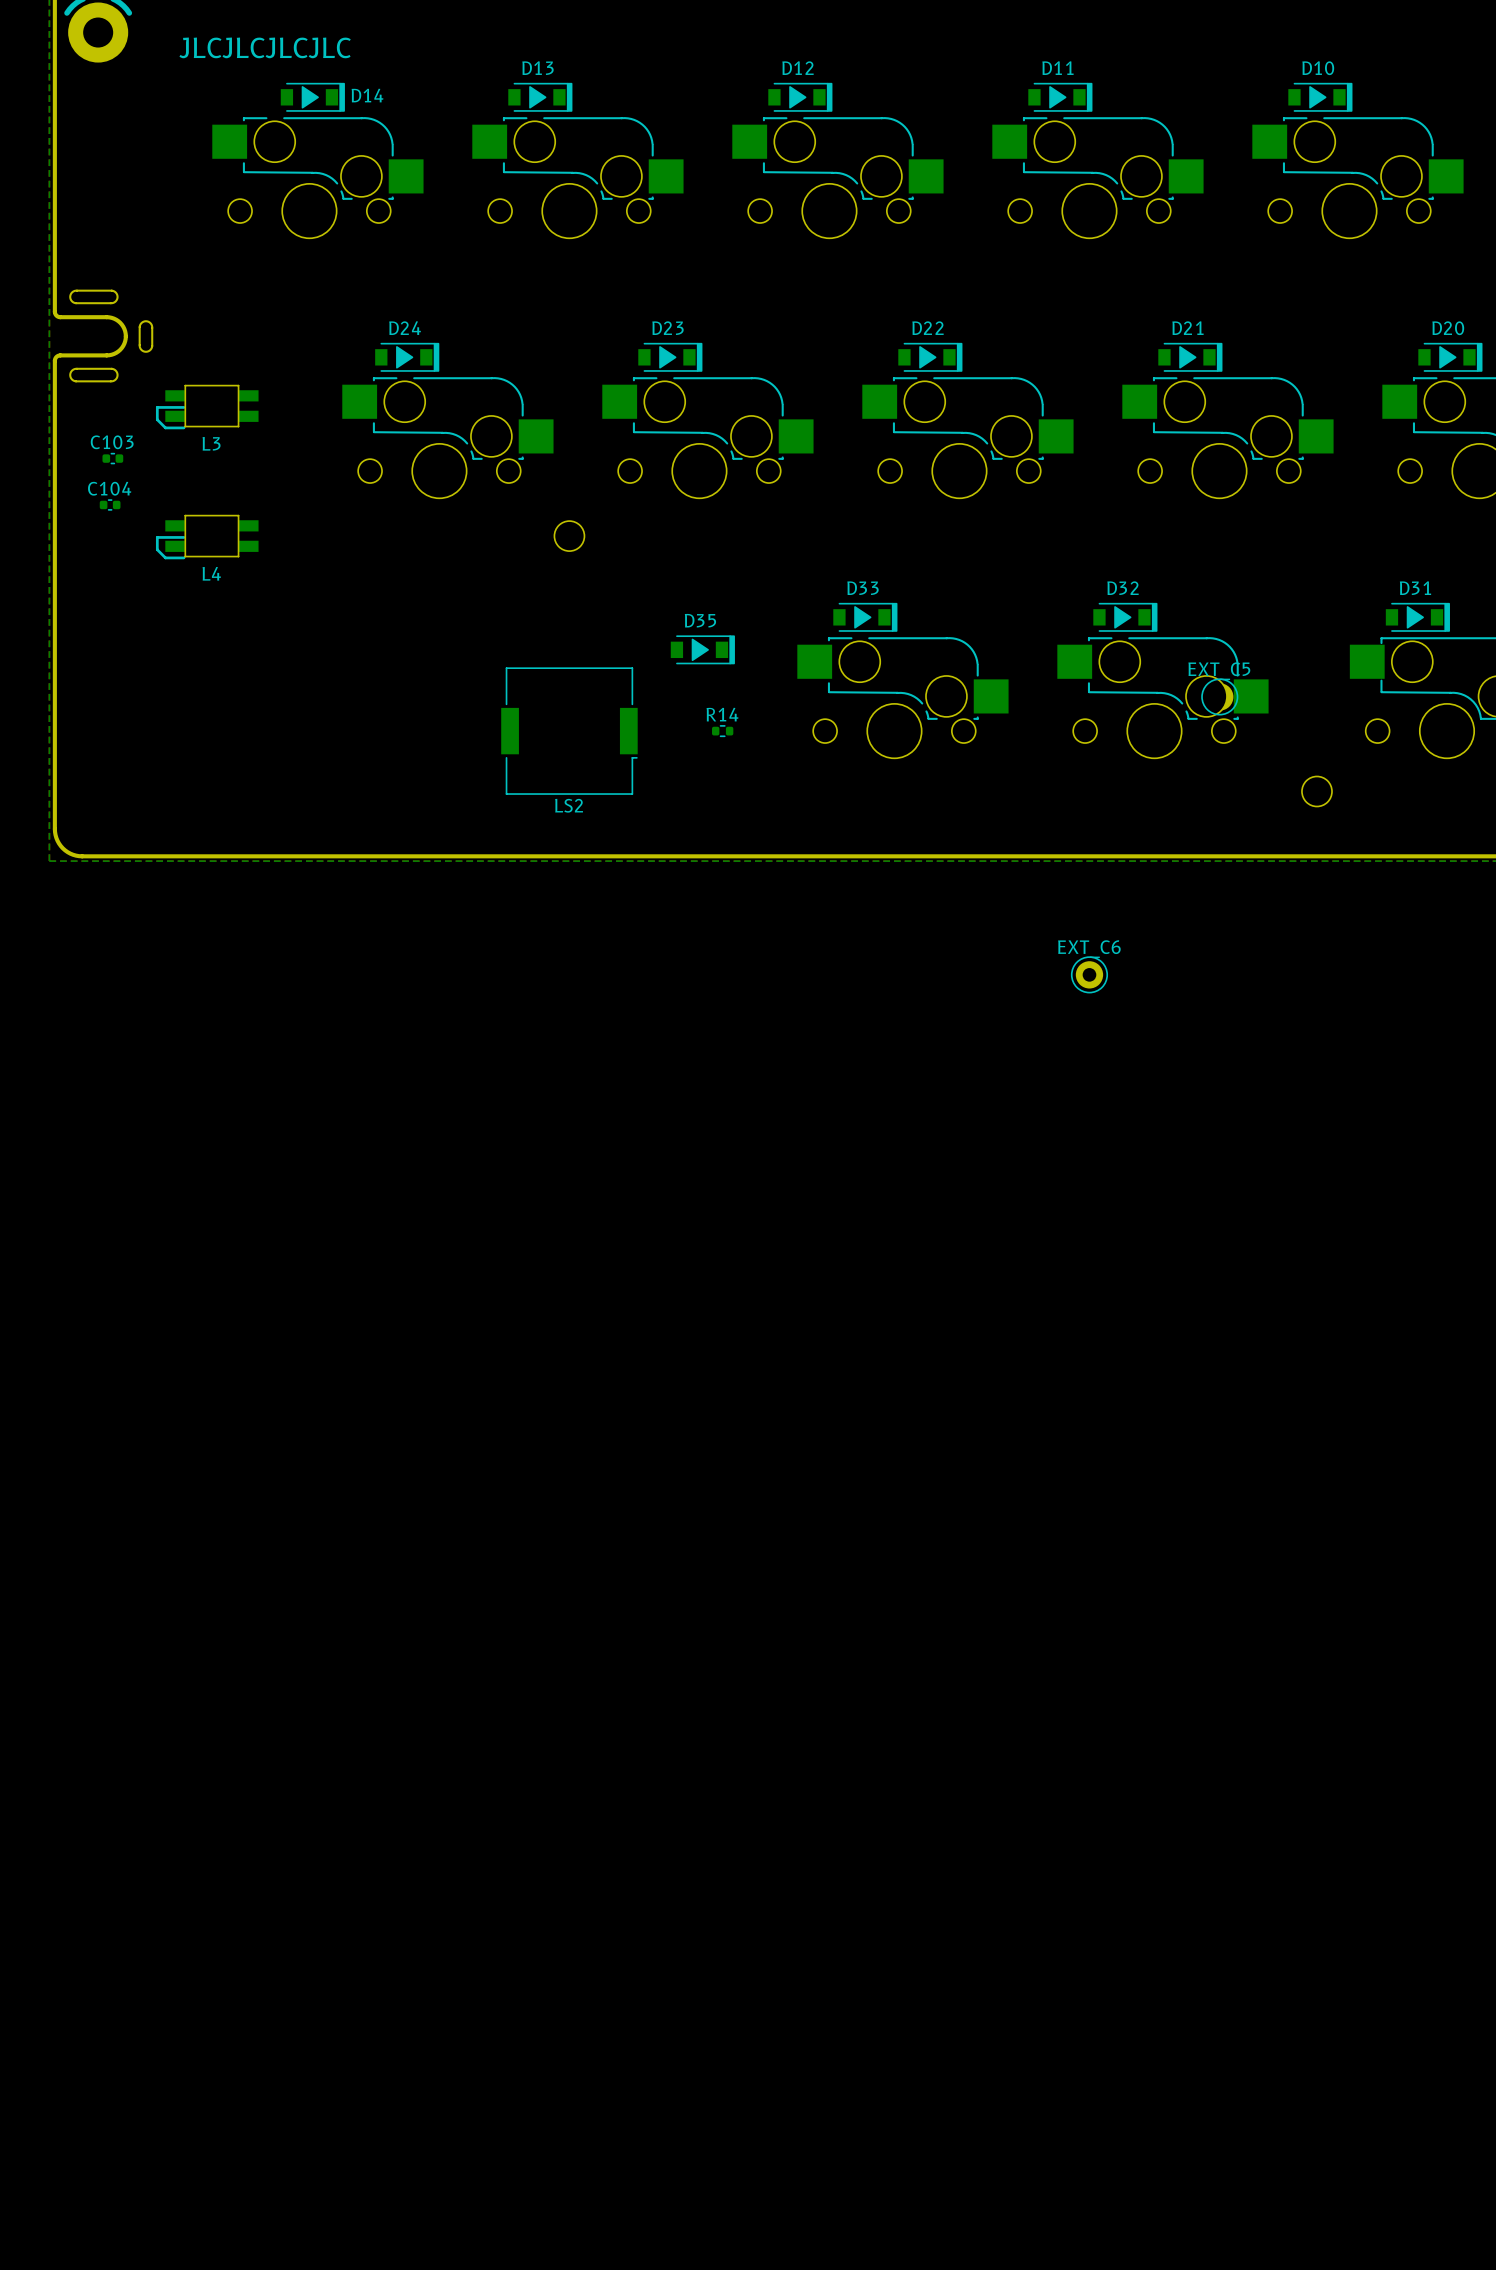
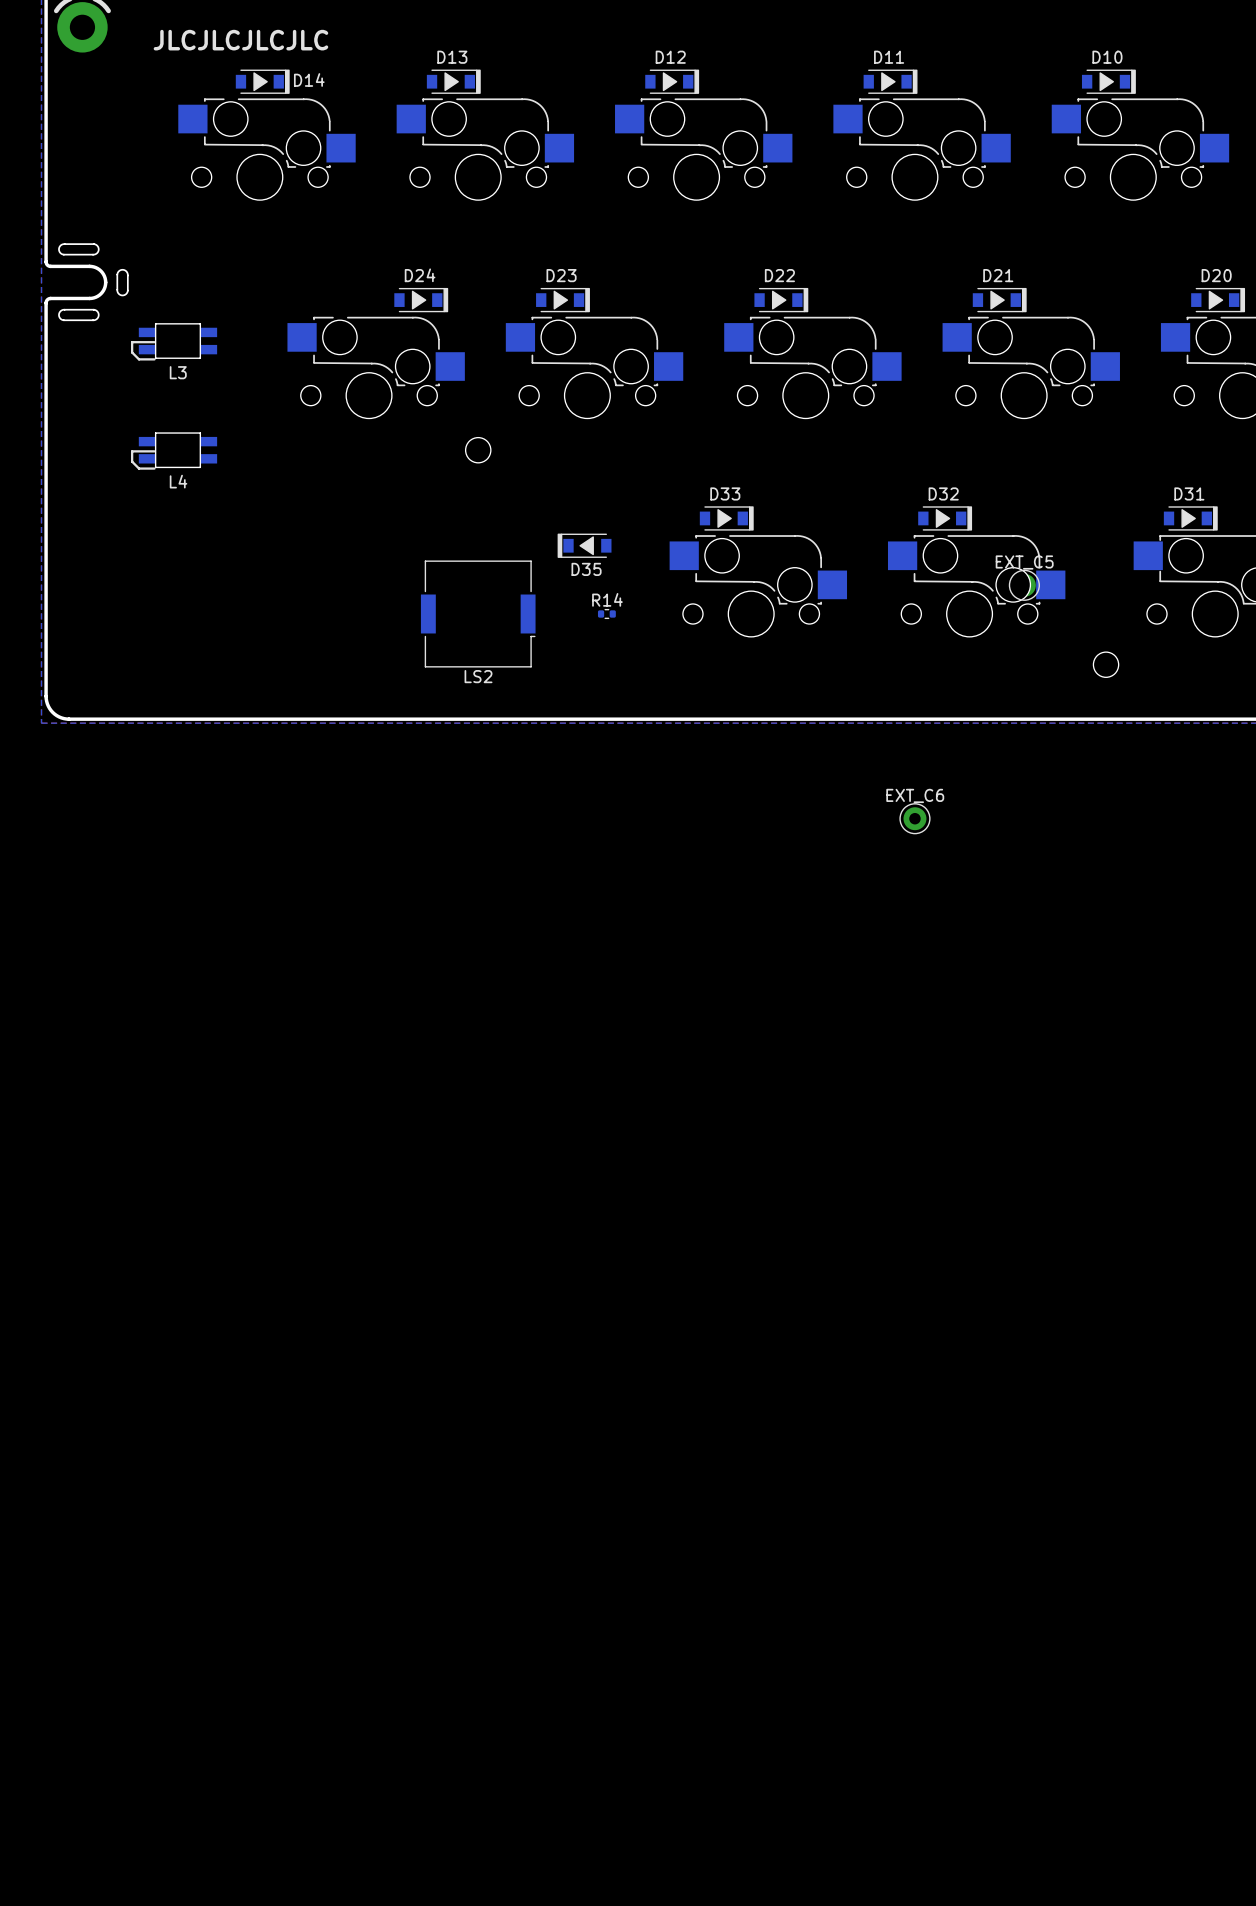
D24 position: (407, 357) -> (421, 300)
C103: (112, 458) -> none
C104: (110, 504) -> none
D35 rotation: 0° (702, 649) -> 180° (584, 545)

